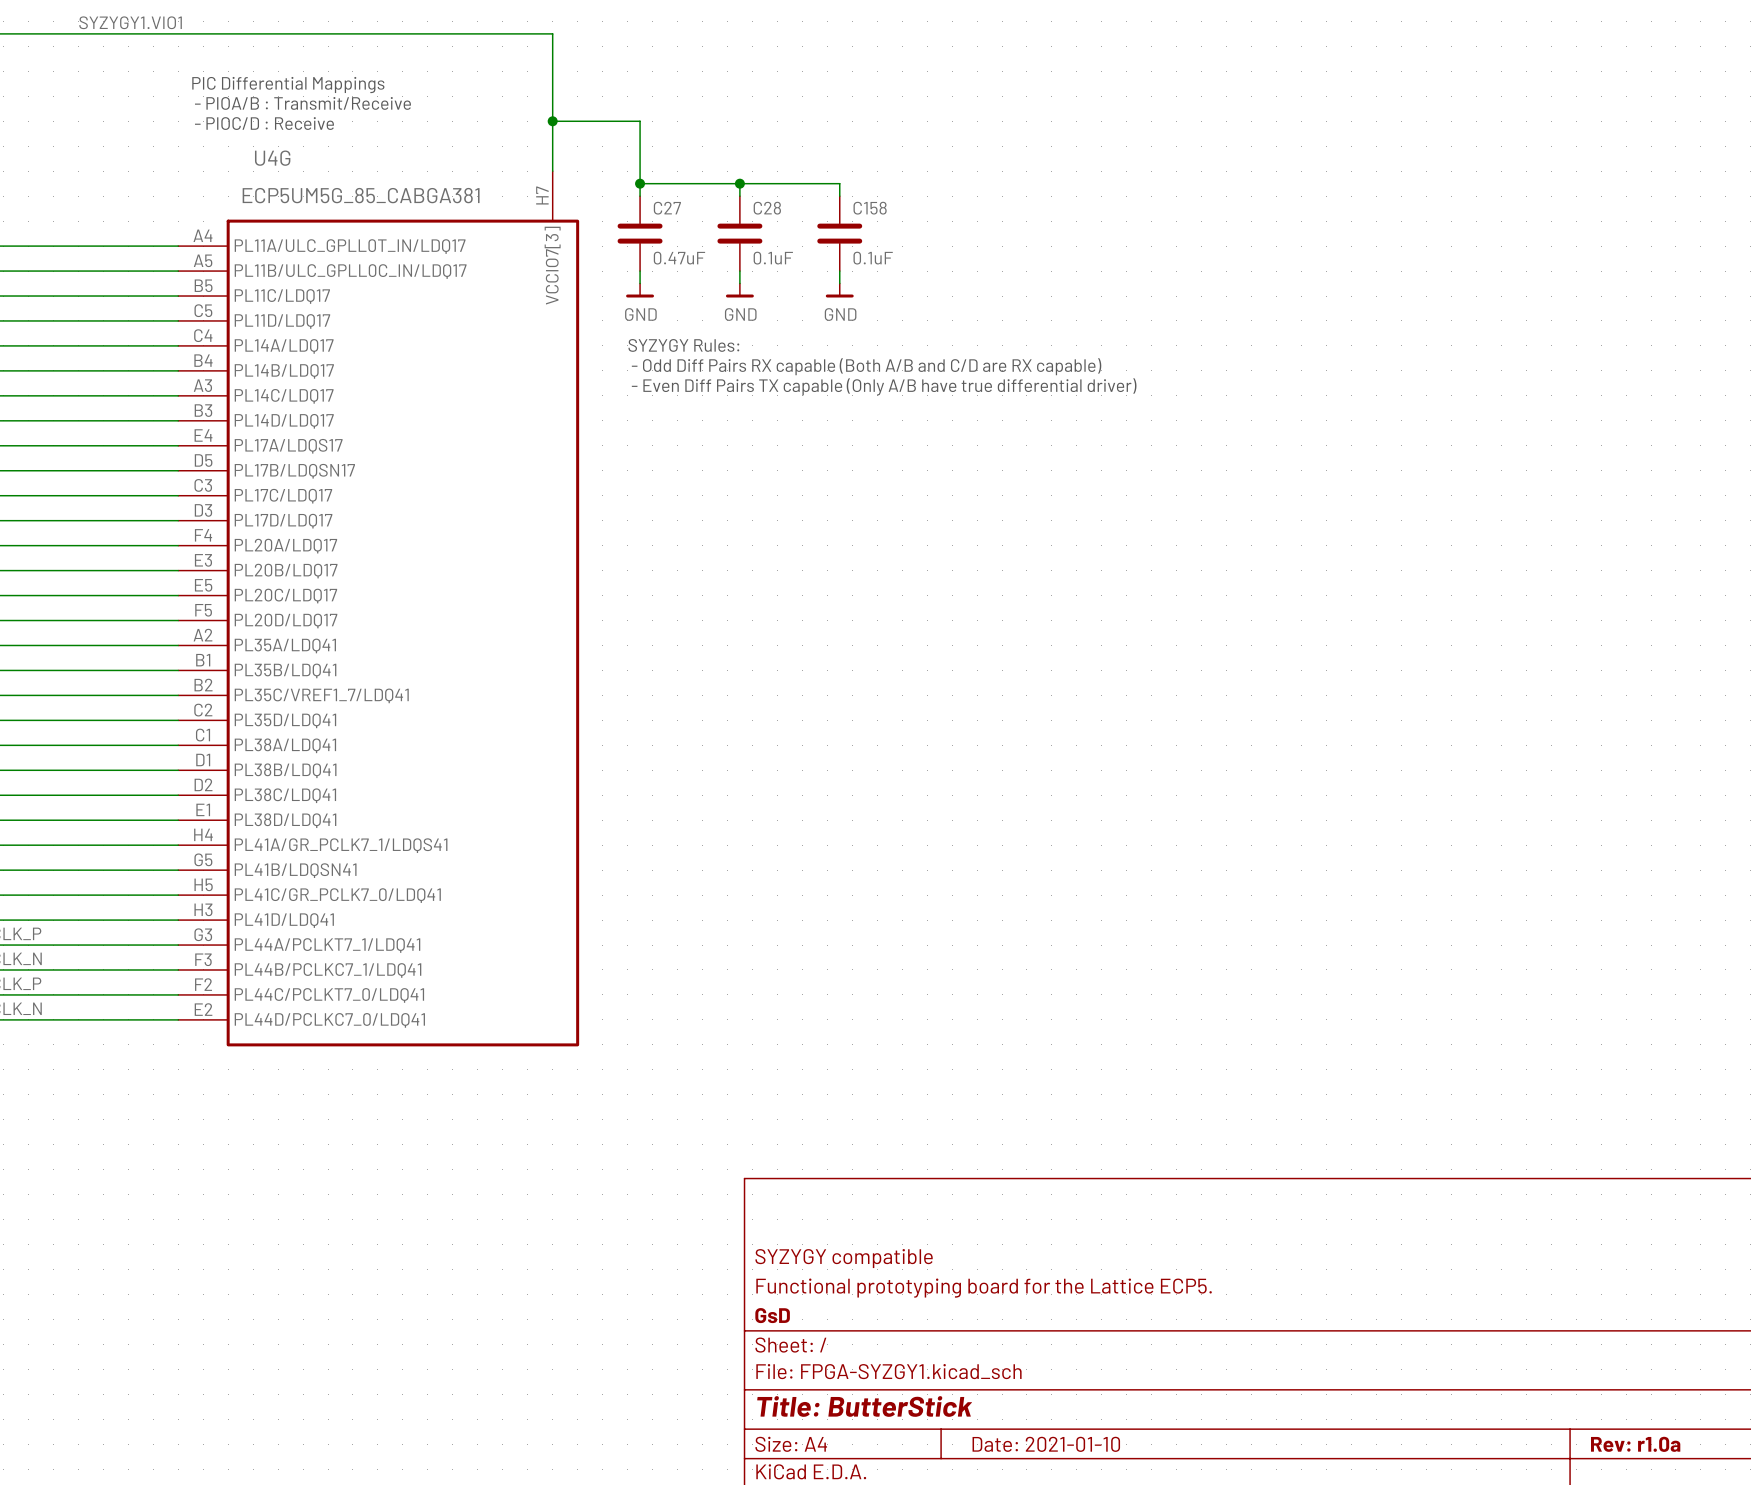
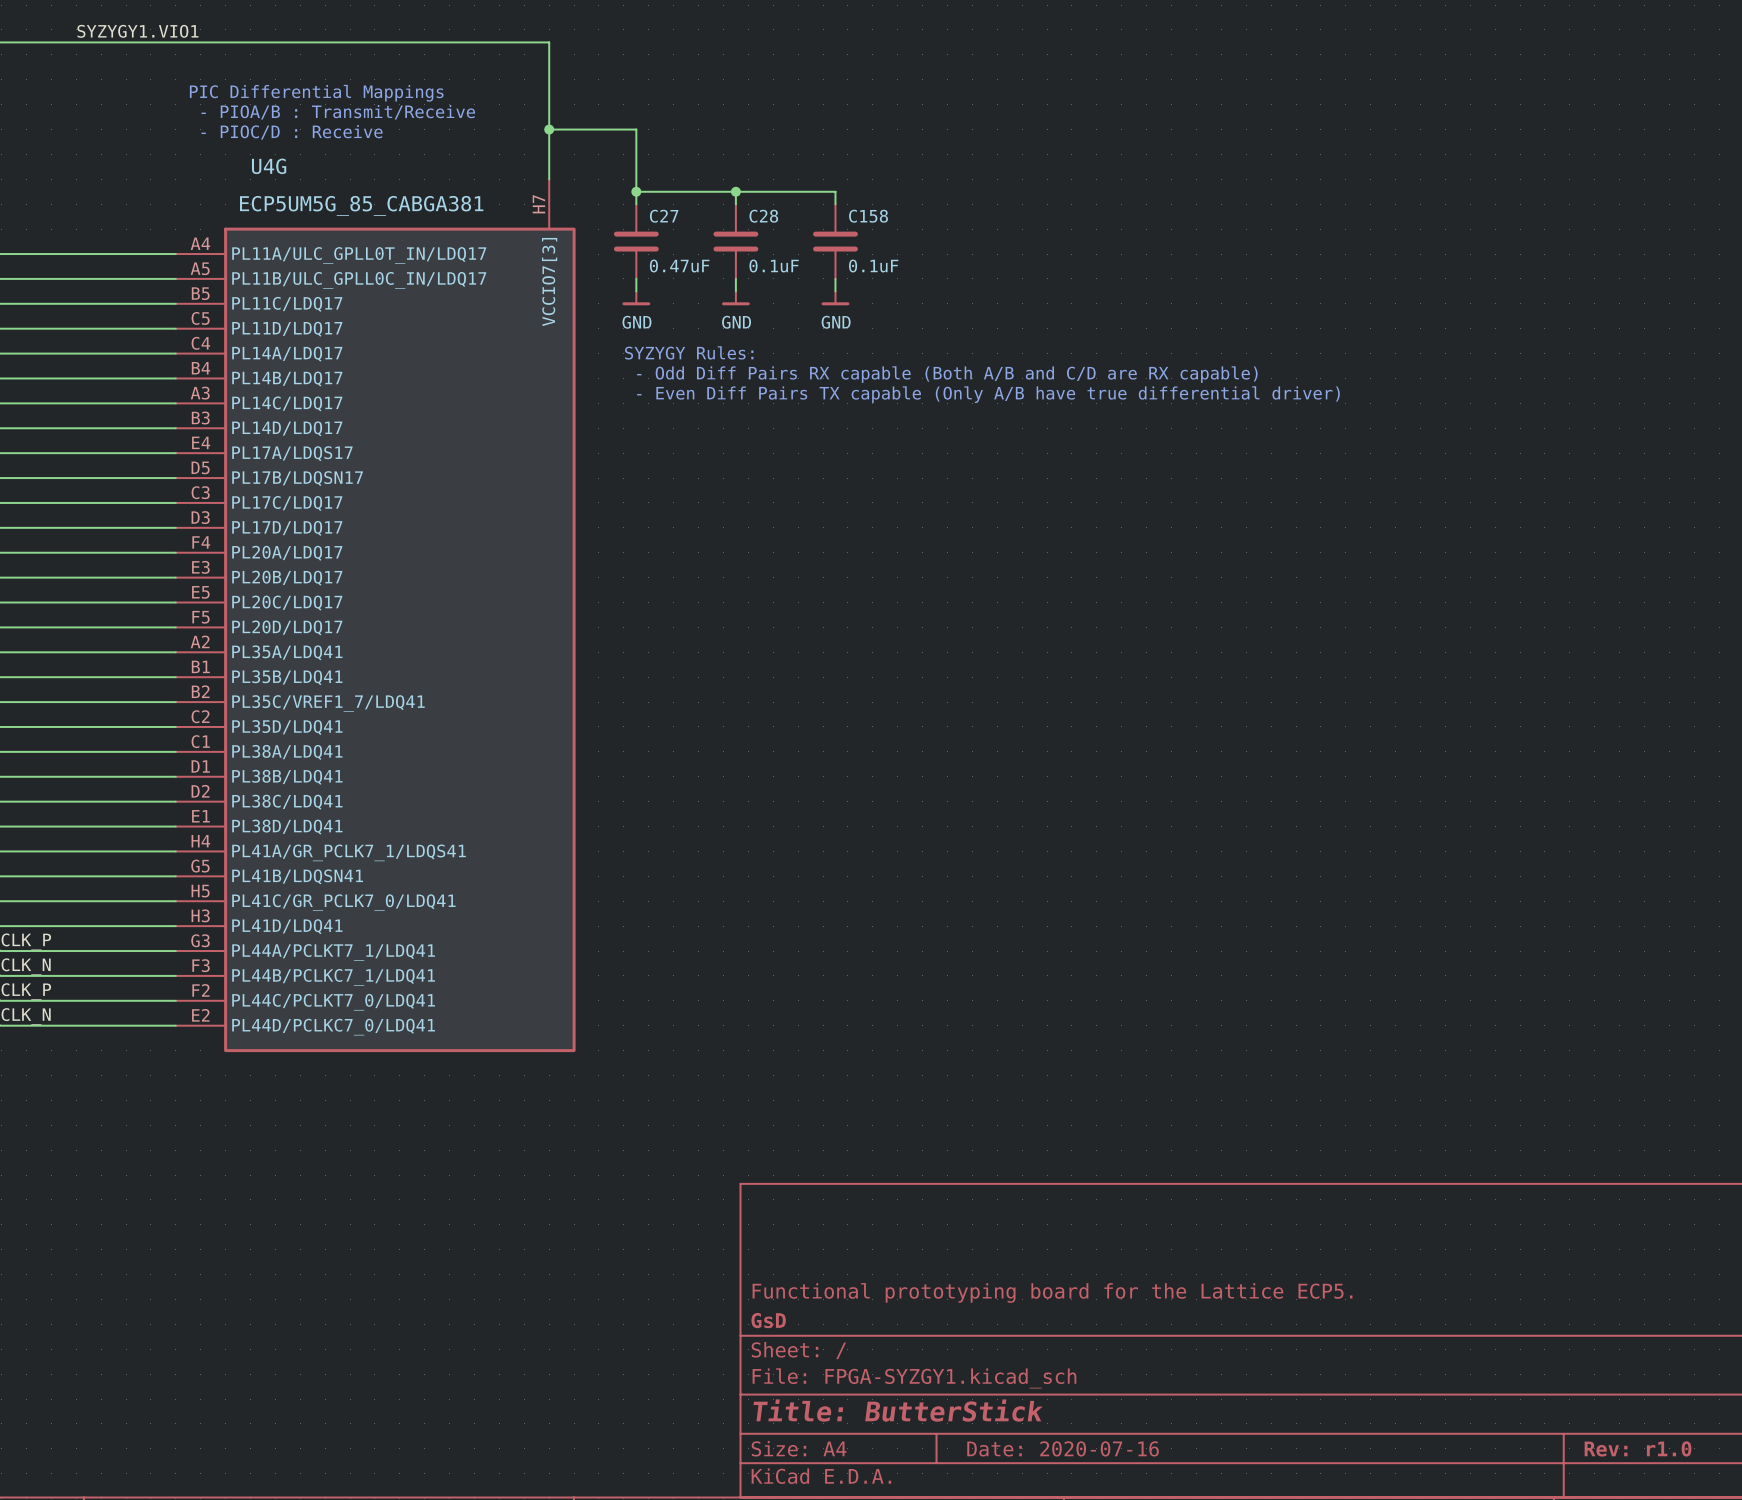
title block: SYZYGY compatible (844, 1258) -> none
title block: Date: 2021-01-10 (1046, 1444) -> Date: 2020-07-16 (1063, 1448)
title block: Rev: r1.0a (1635, 1444) -> Rev: r1.0 (1638, 1448)

